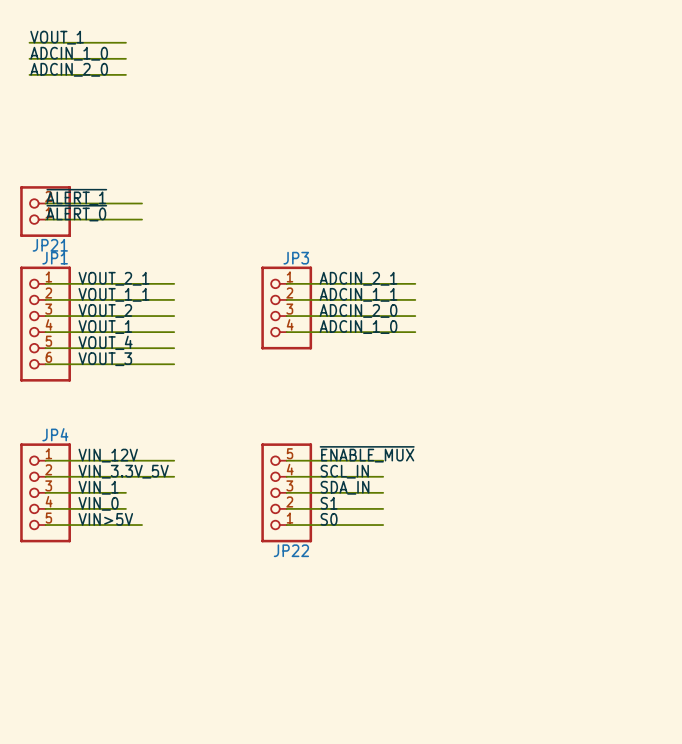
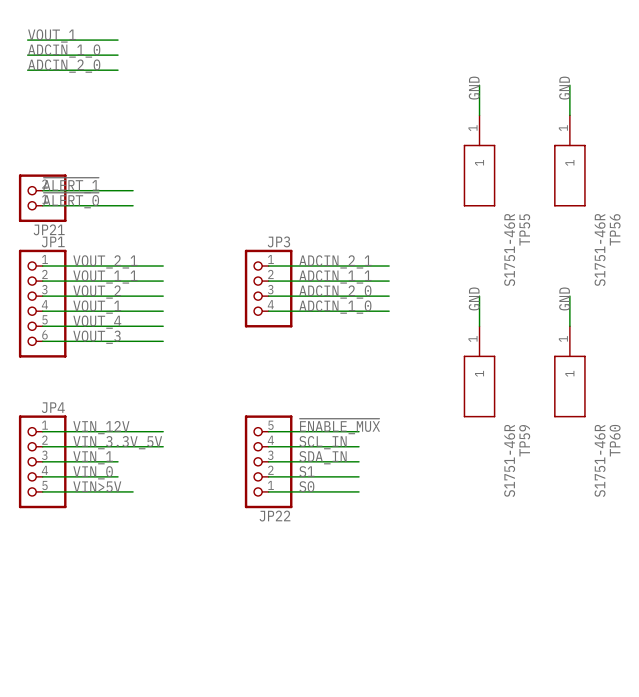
wire: none -> (479, 85) (479, 115)
wire: none -> (569, 85) (569, 115)
label: none -> GND (474, 88)
label: none -> GND (564, 88)
TP55: none -> S1751-46R (479, 160)
TP56: none -> S1751-46R (569, 160)
label: none -> GND (474, 298)
wire: none -> (479, 296) (479, 326)
label: none -> GND (564, 298)
wire: none -> (569, 296) (569, 326)
TP59: none -> S1751-46R (479, 371)
TP60: none -> S1751-46R (569, 371)

